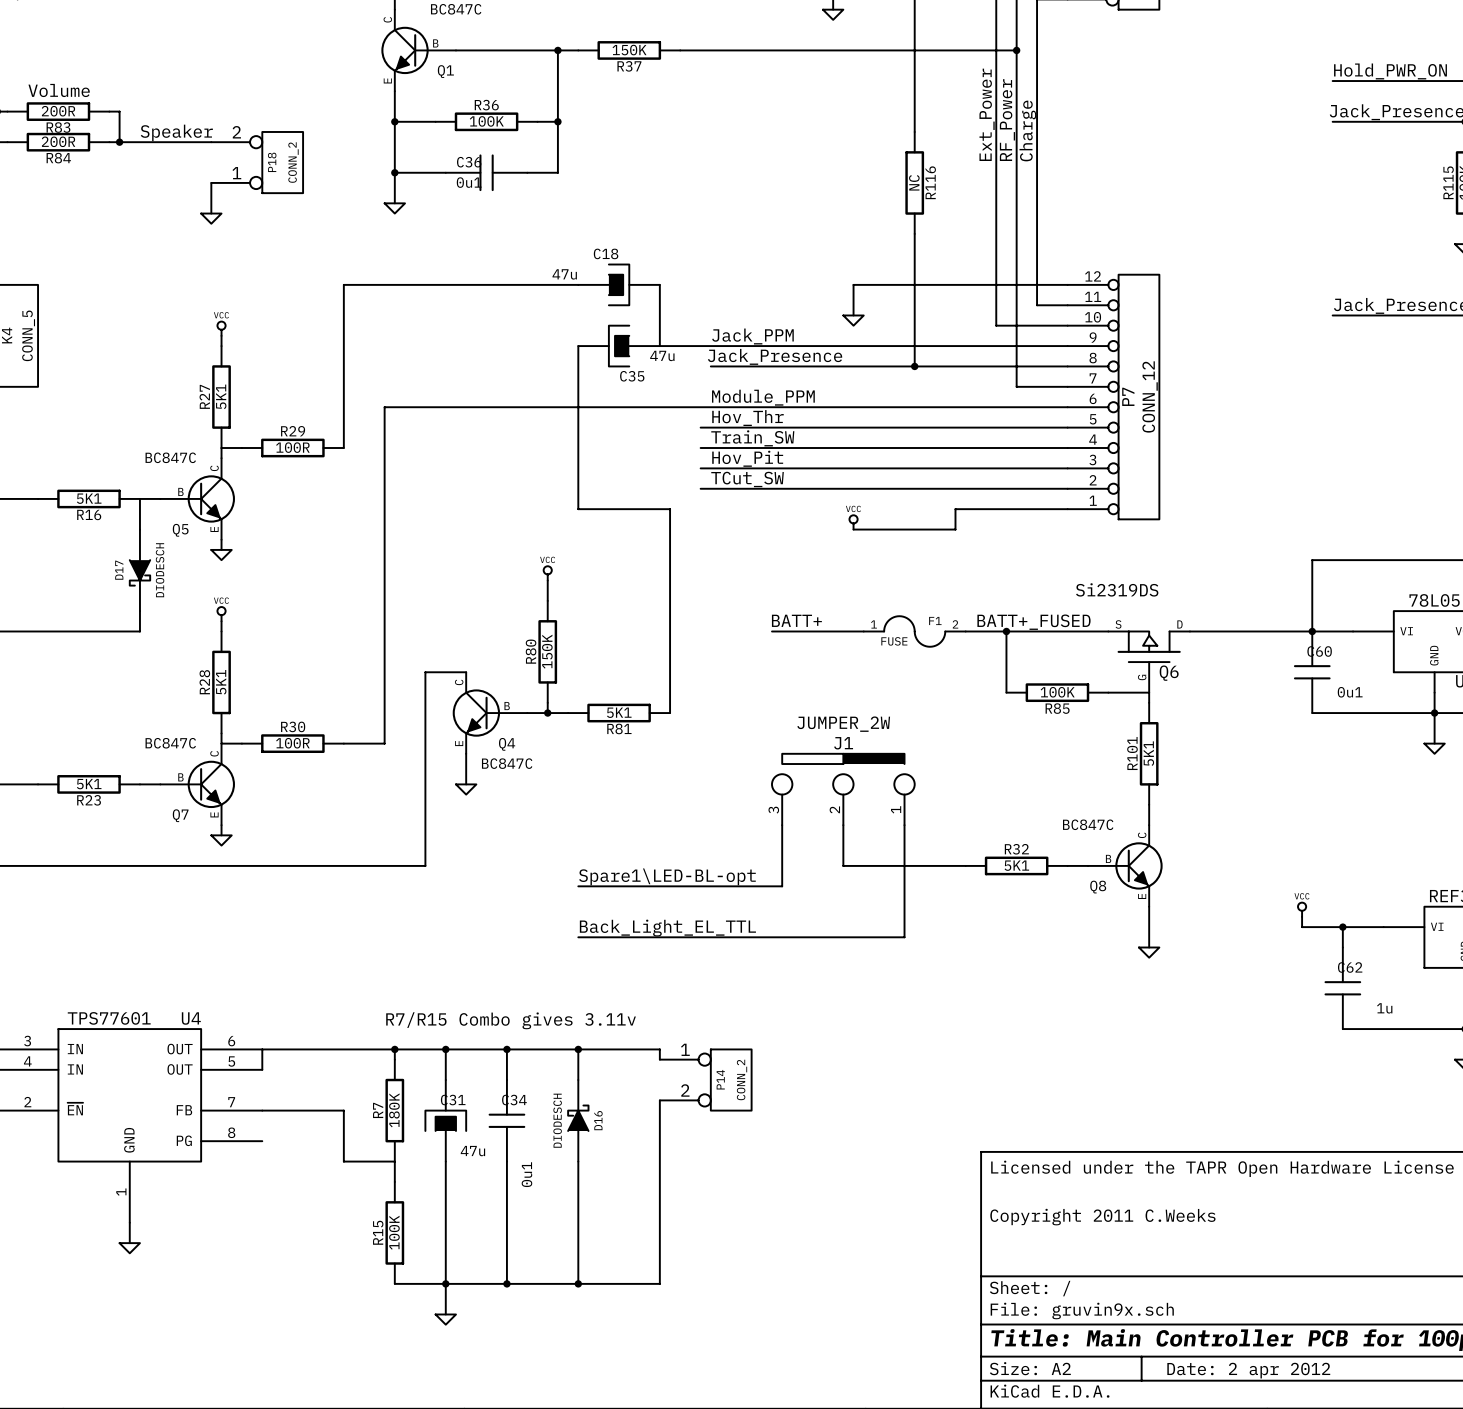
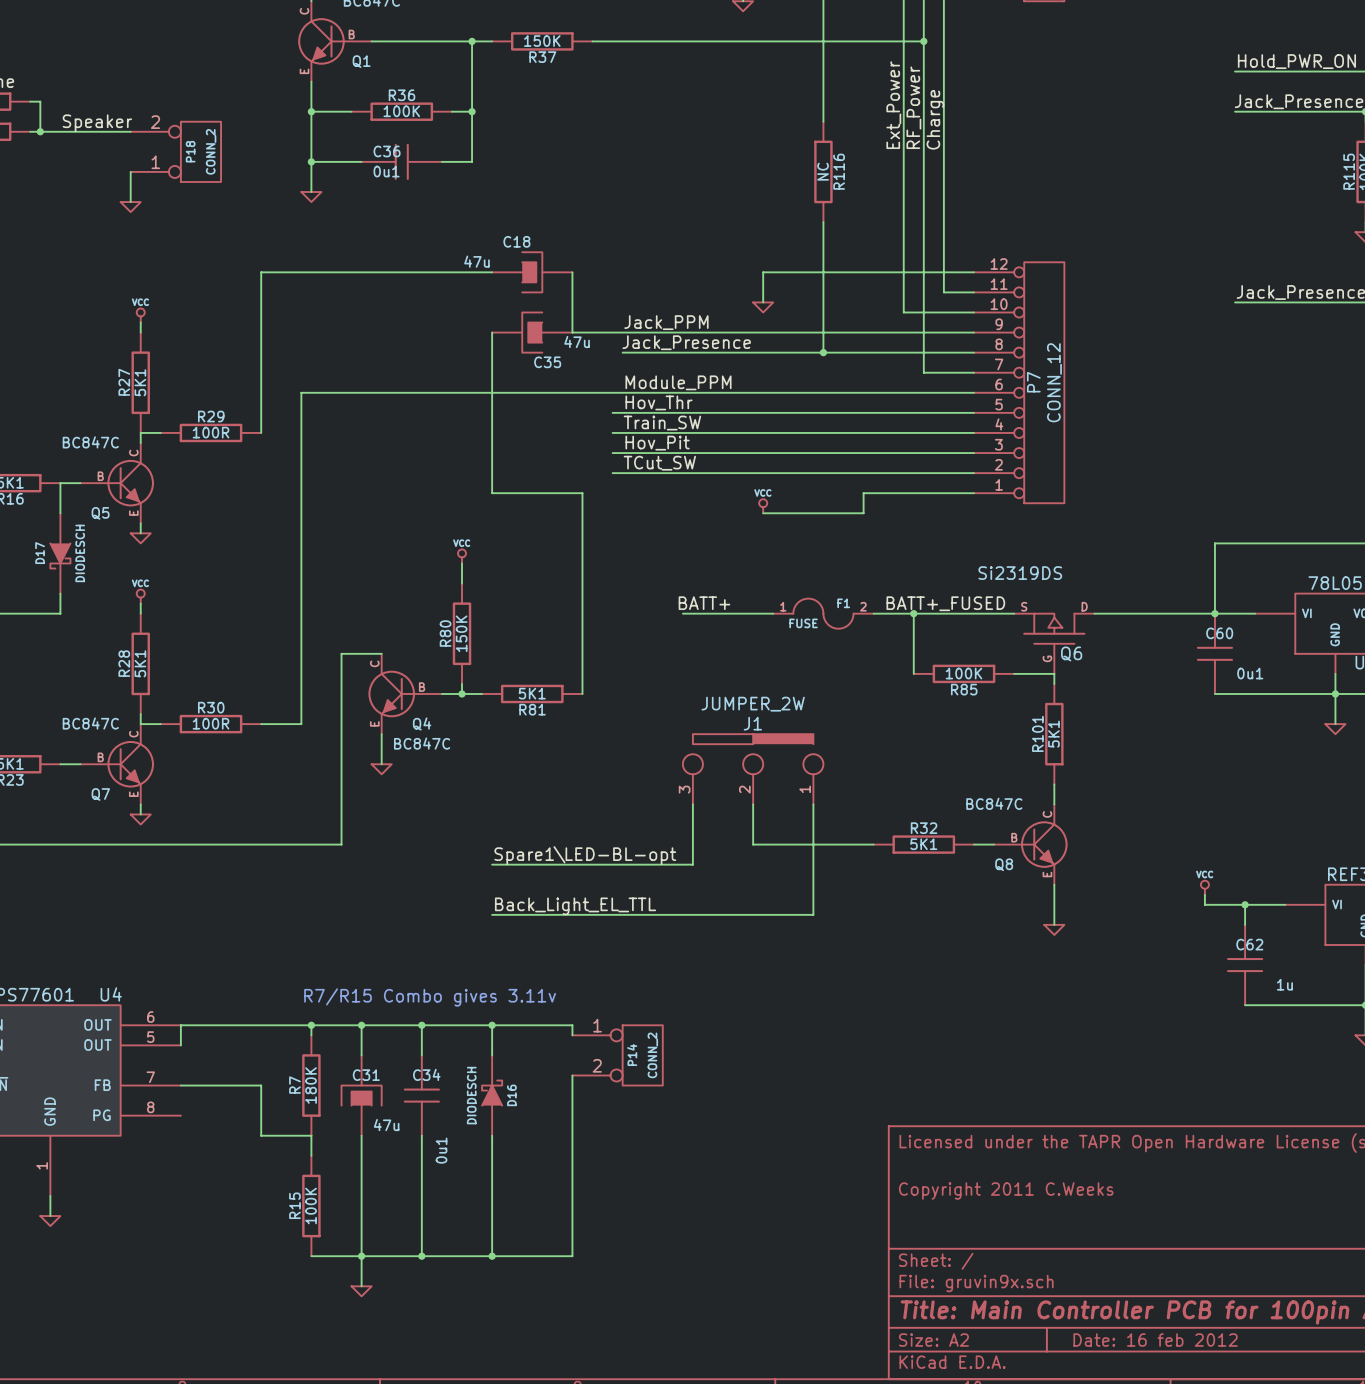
title block: Date: 2 apr 2012 (1248, 1370) -> Date: 16 feb 2012 (1155, 1340)

